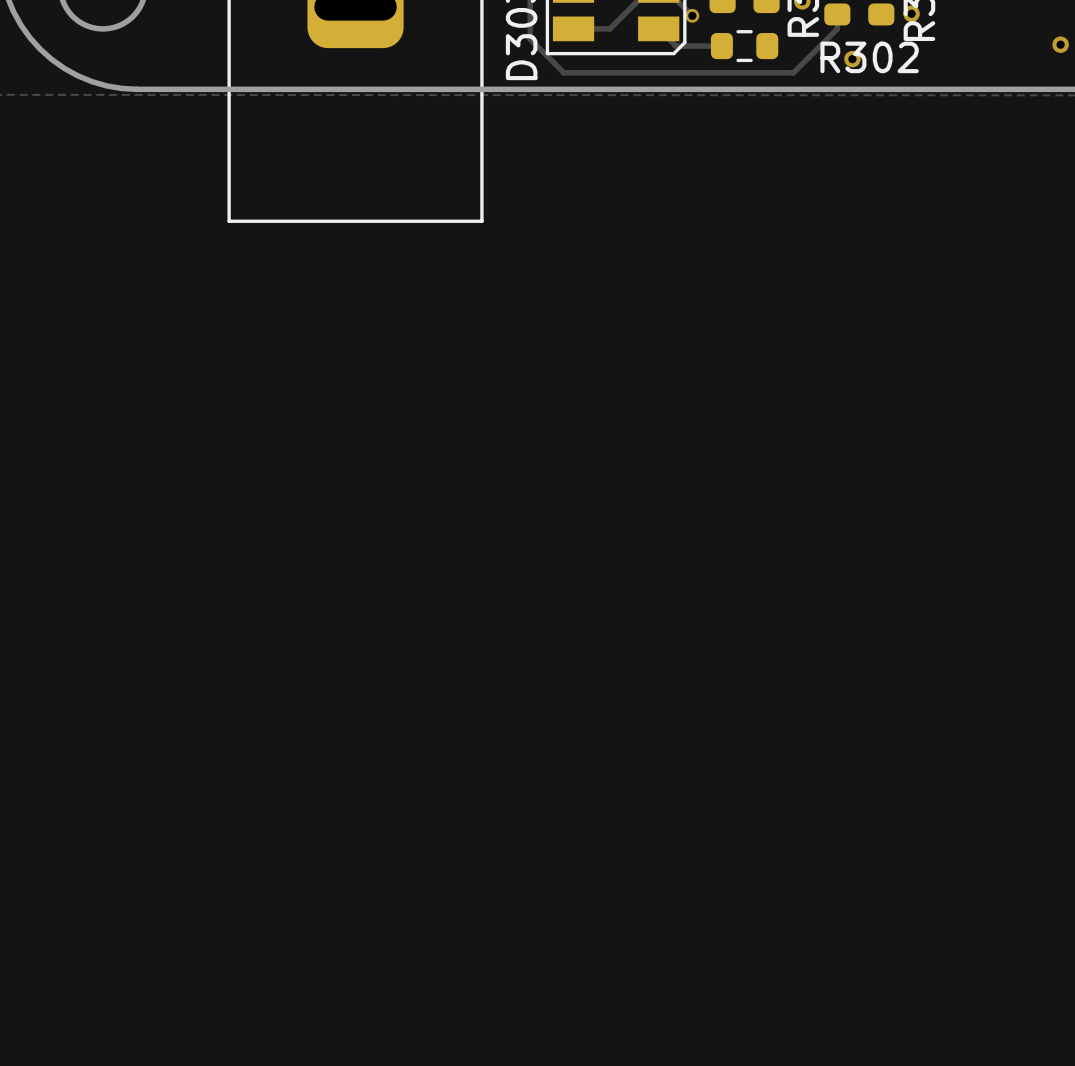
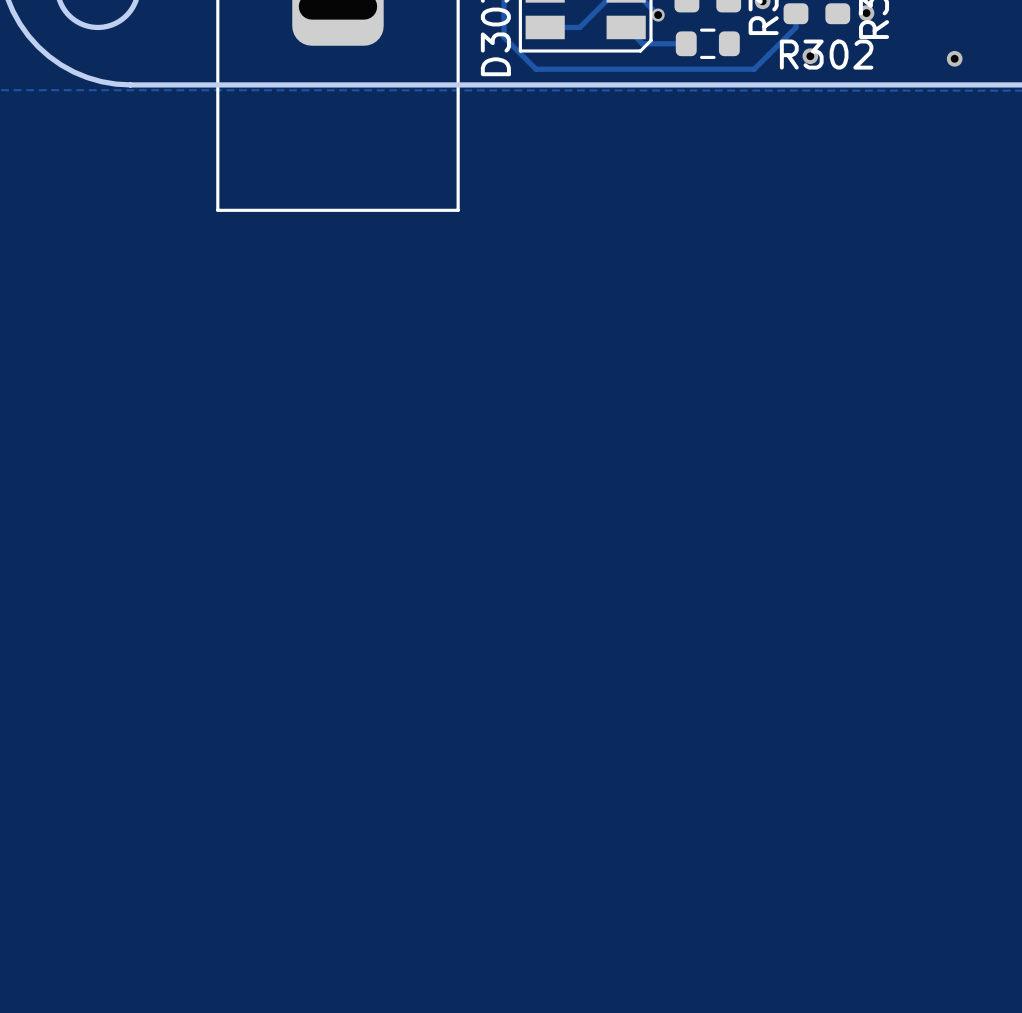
via position: (1060, 44) -> (954, 58)

